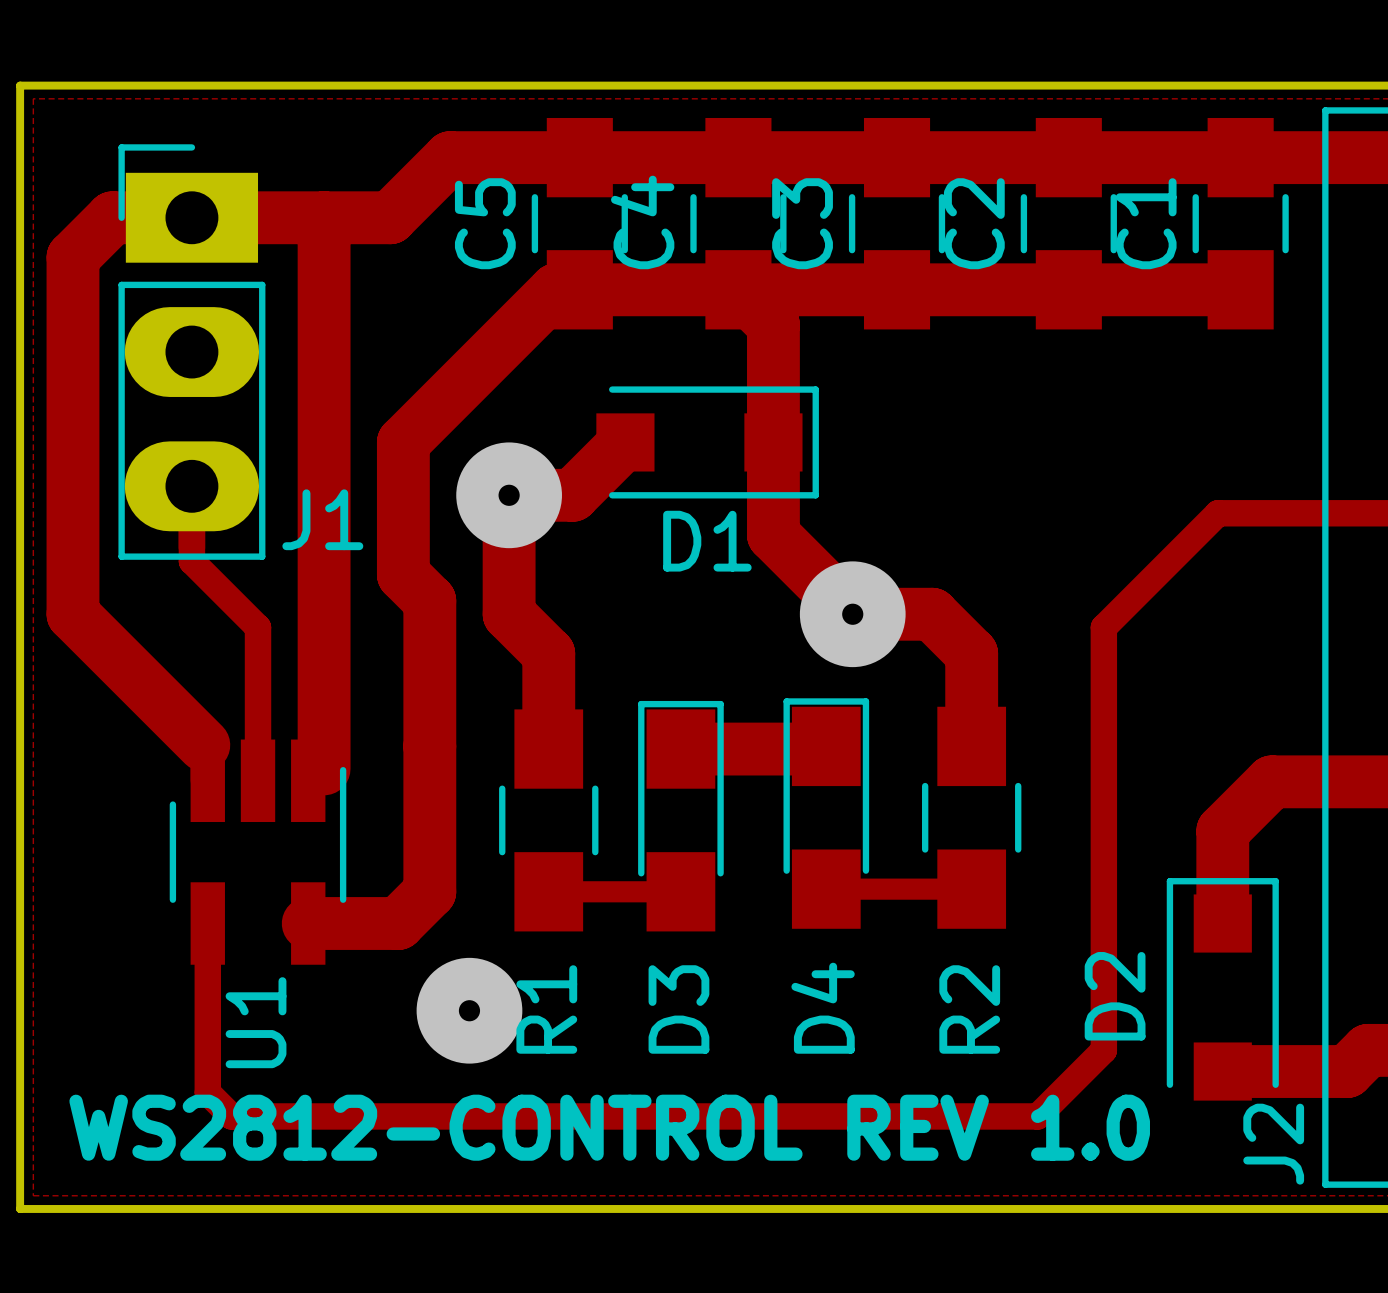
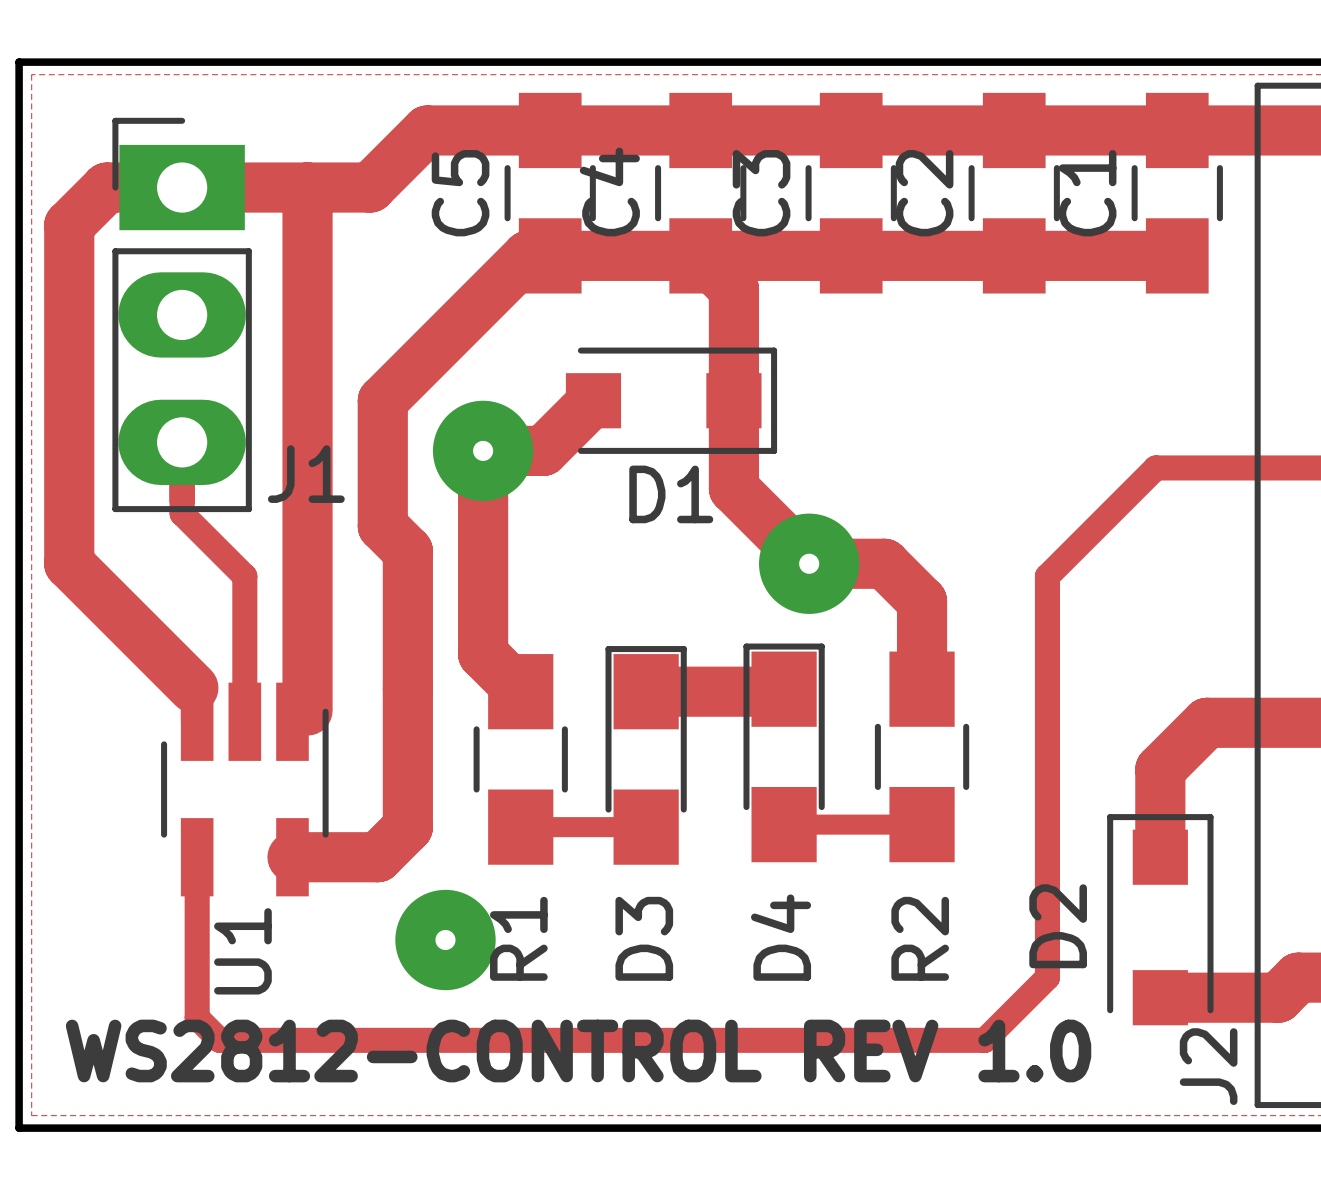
track: (509, 614) (548, 653) (548, 749) -> (483, 563) (483, 654) (520, 691)

